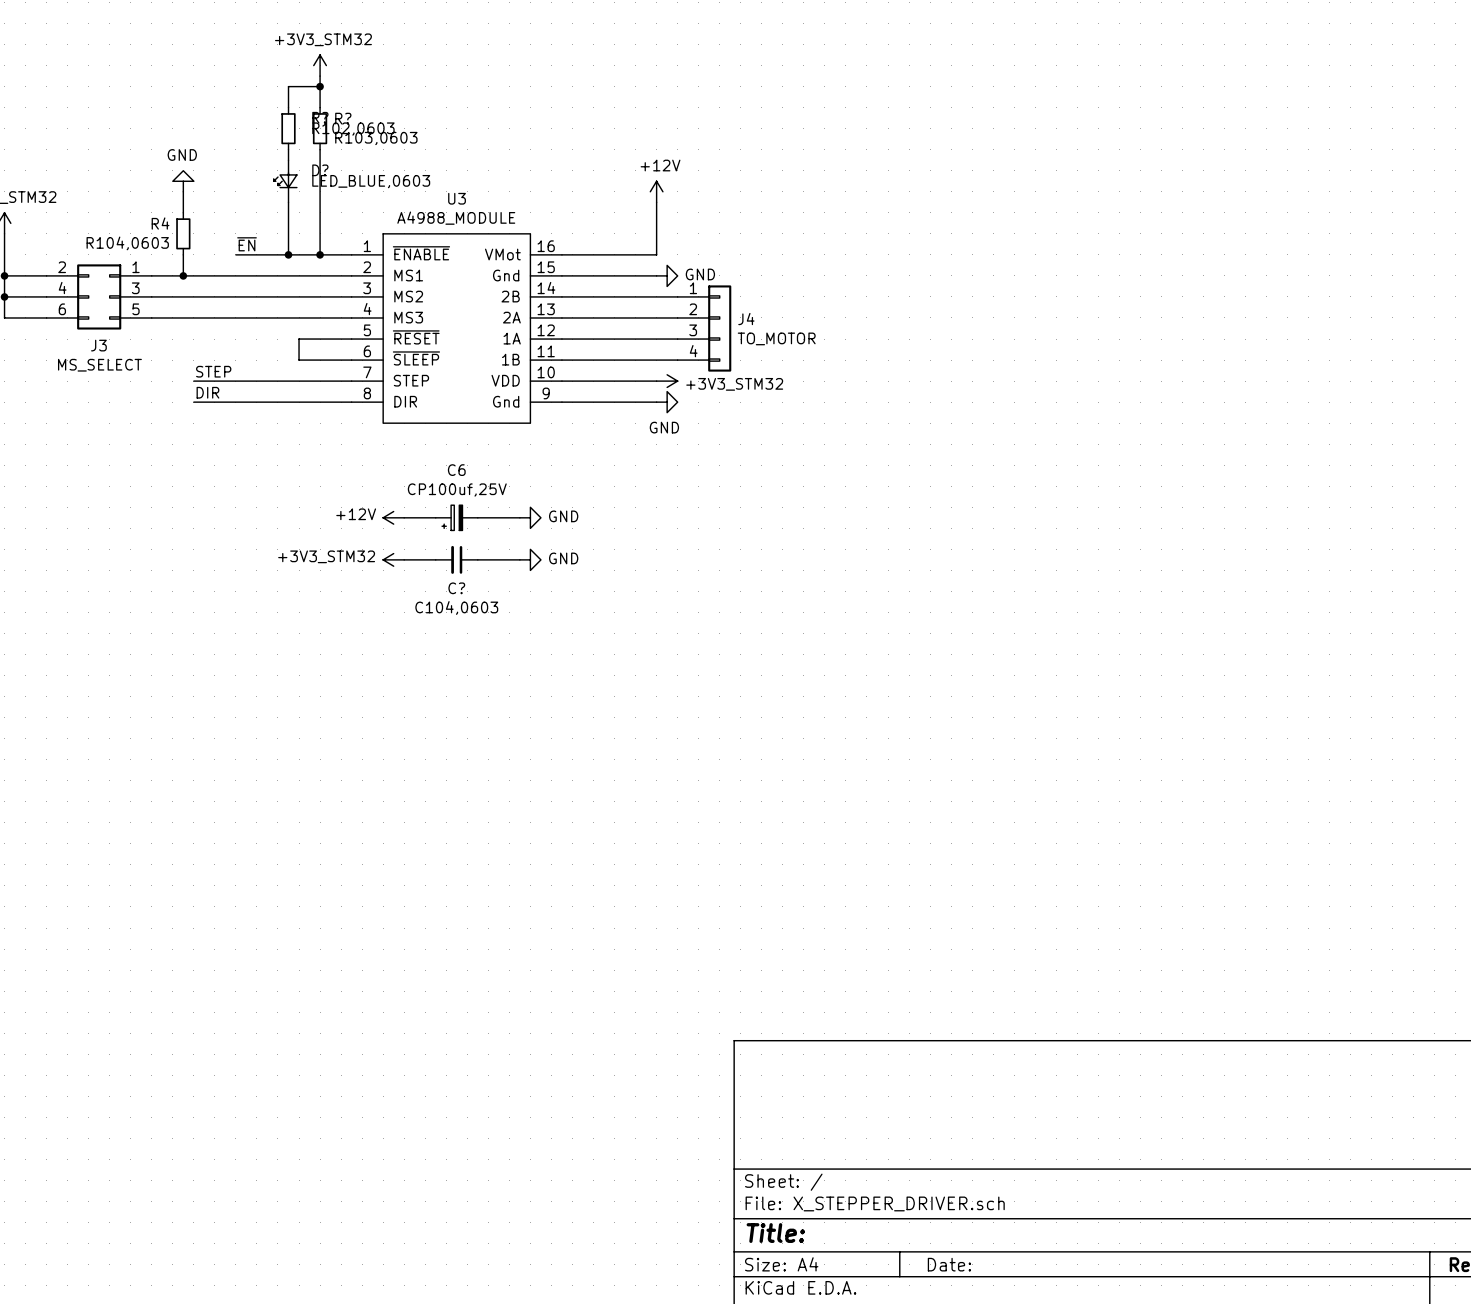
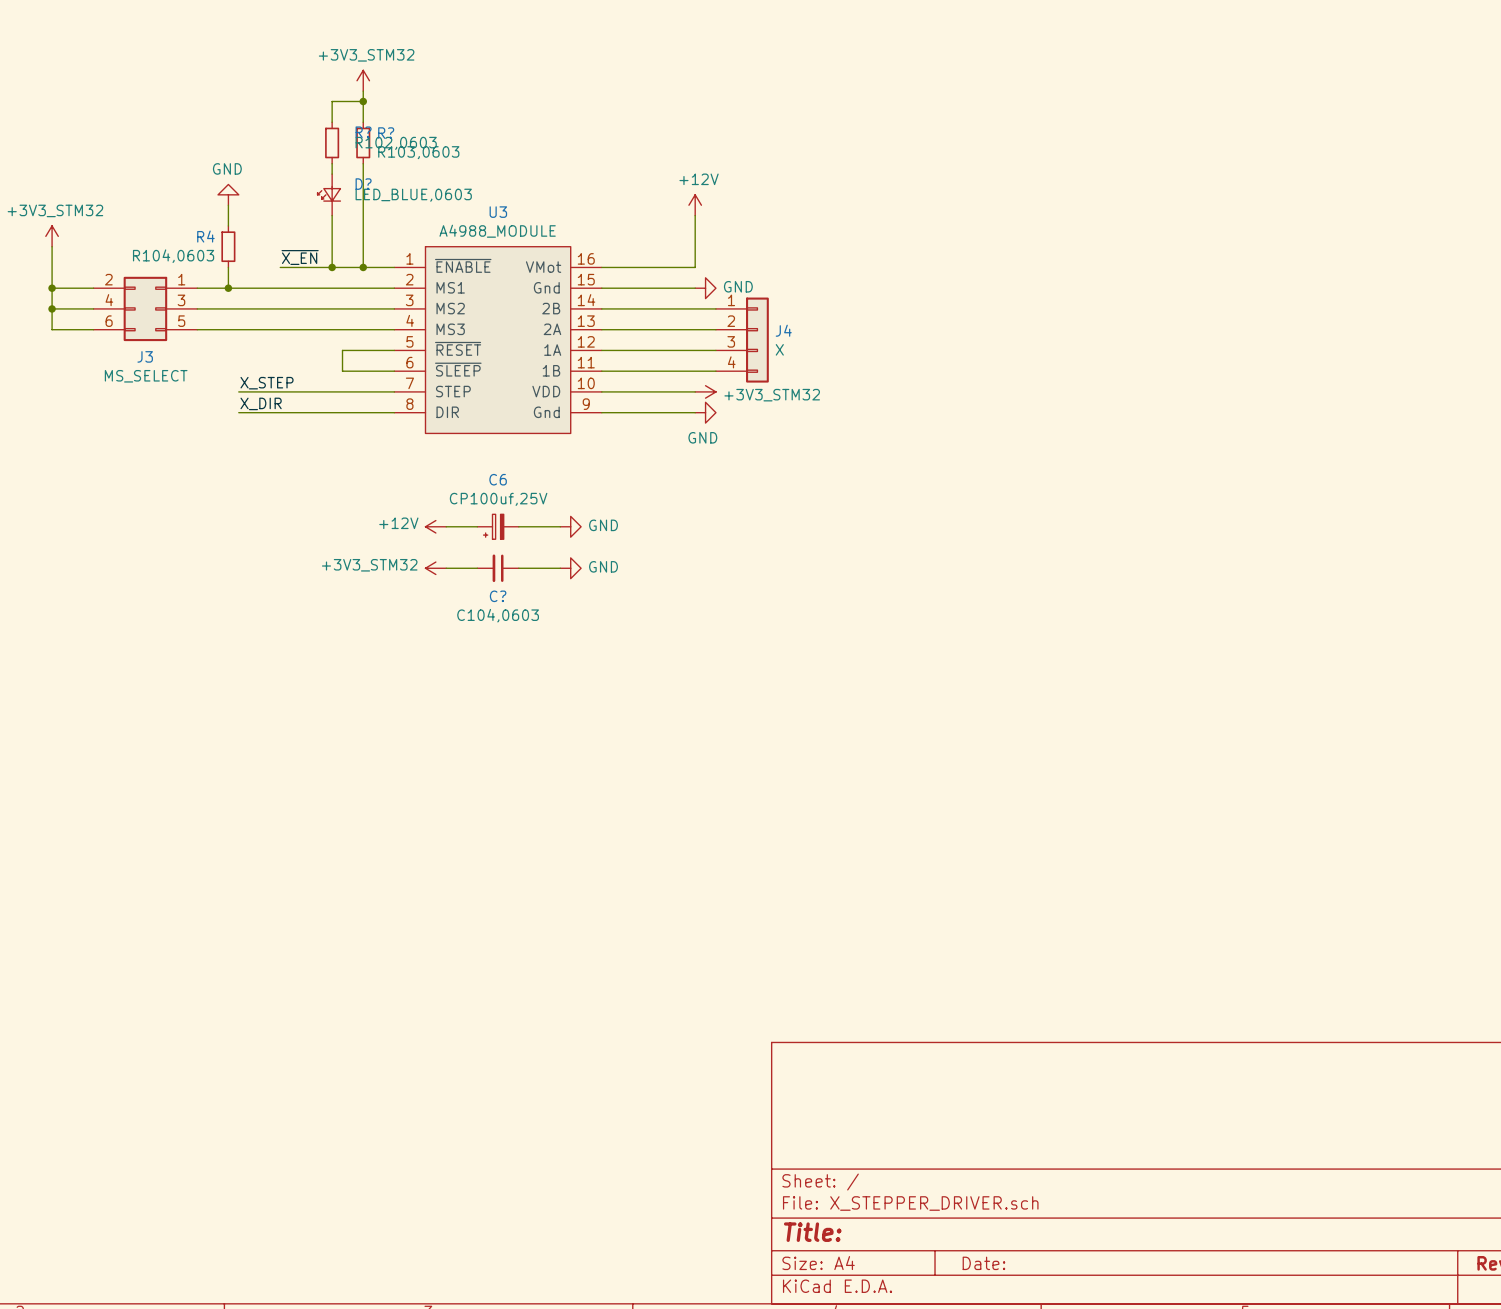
label: ~{EN} (247, 244) -> ~{X_EN} (300, 257)
J4 value: TO_MOTOR (776, 338) -> X (779, 349)
label: STEP (213, 371) -> X_STEP (267, 383)
label: DIR (207, 392) -> X_DIR (261, 403)

